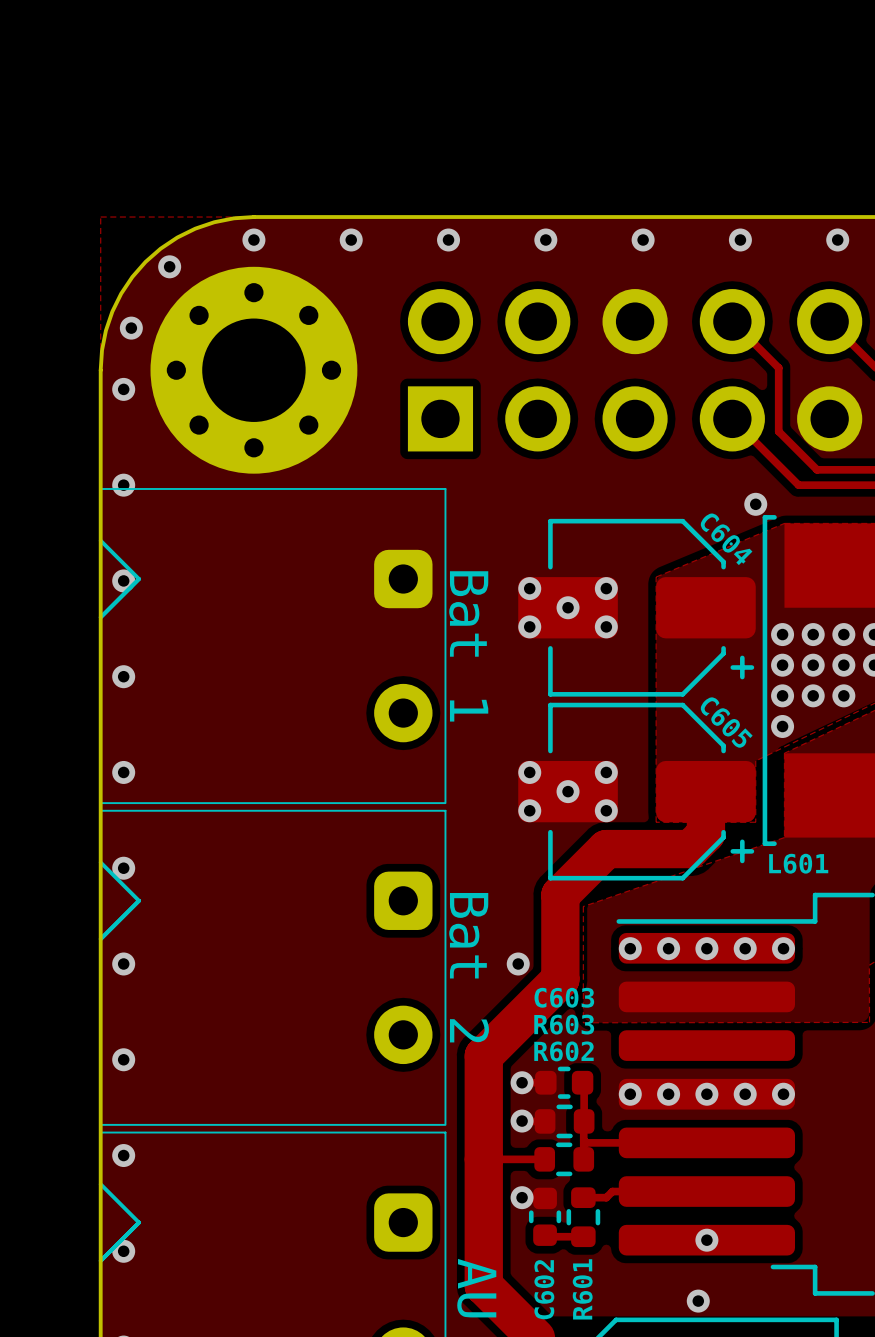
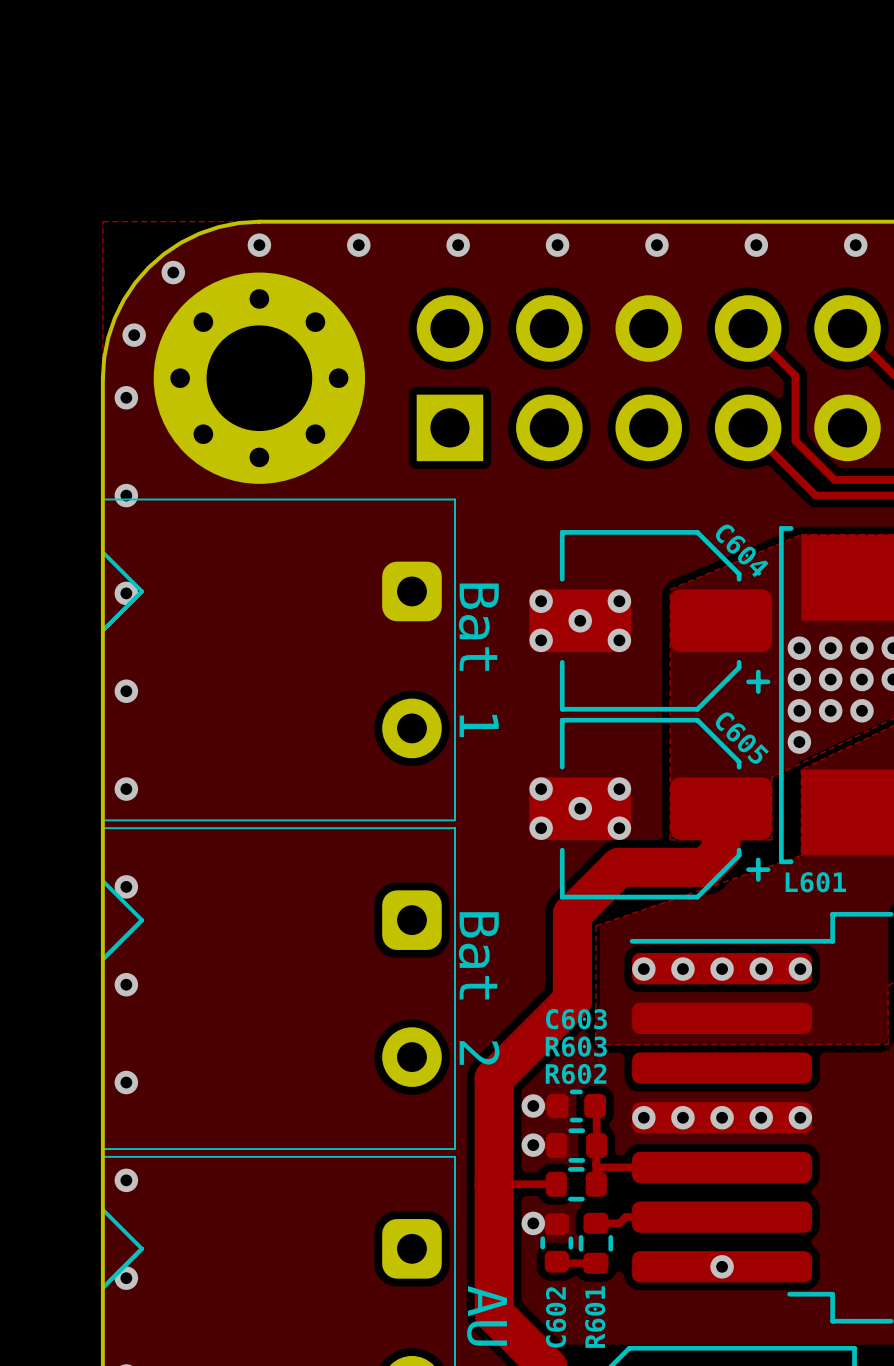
via: (755, 504) -> none
via: (518, 963) -> none
via: (698, 1301) -> none

